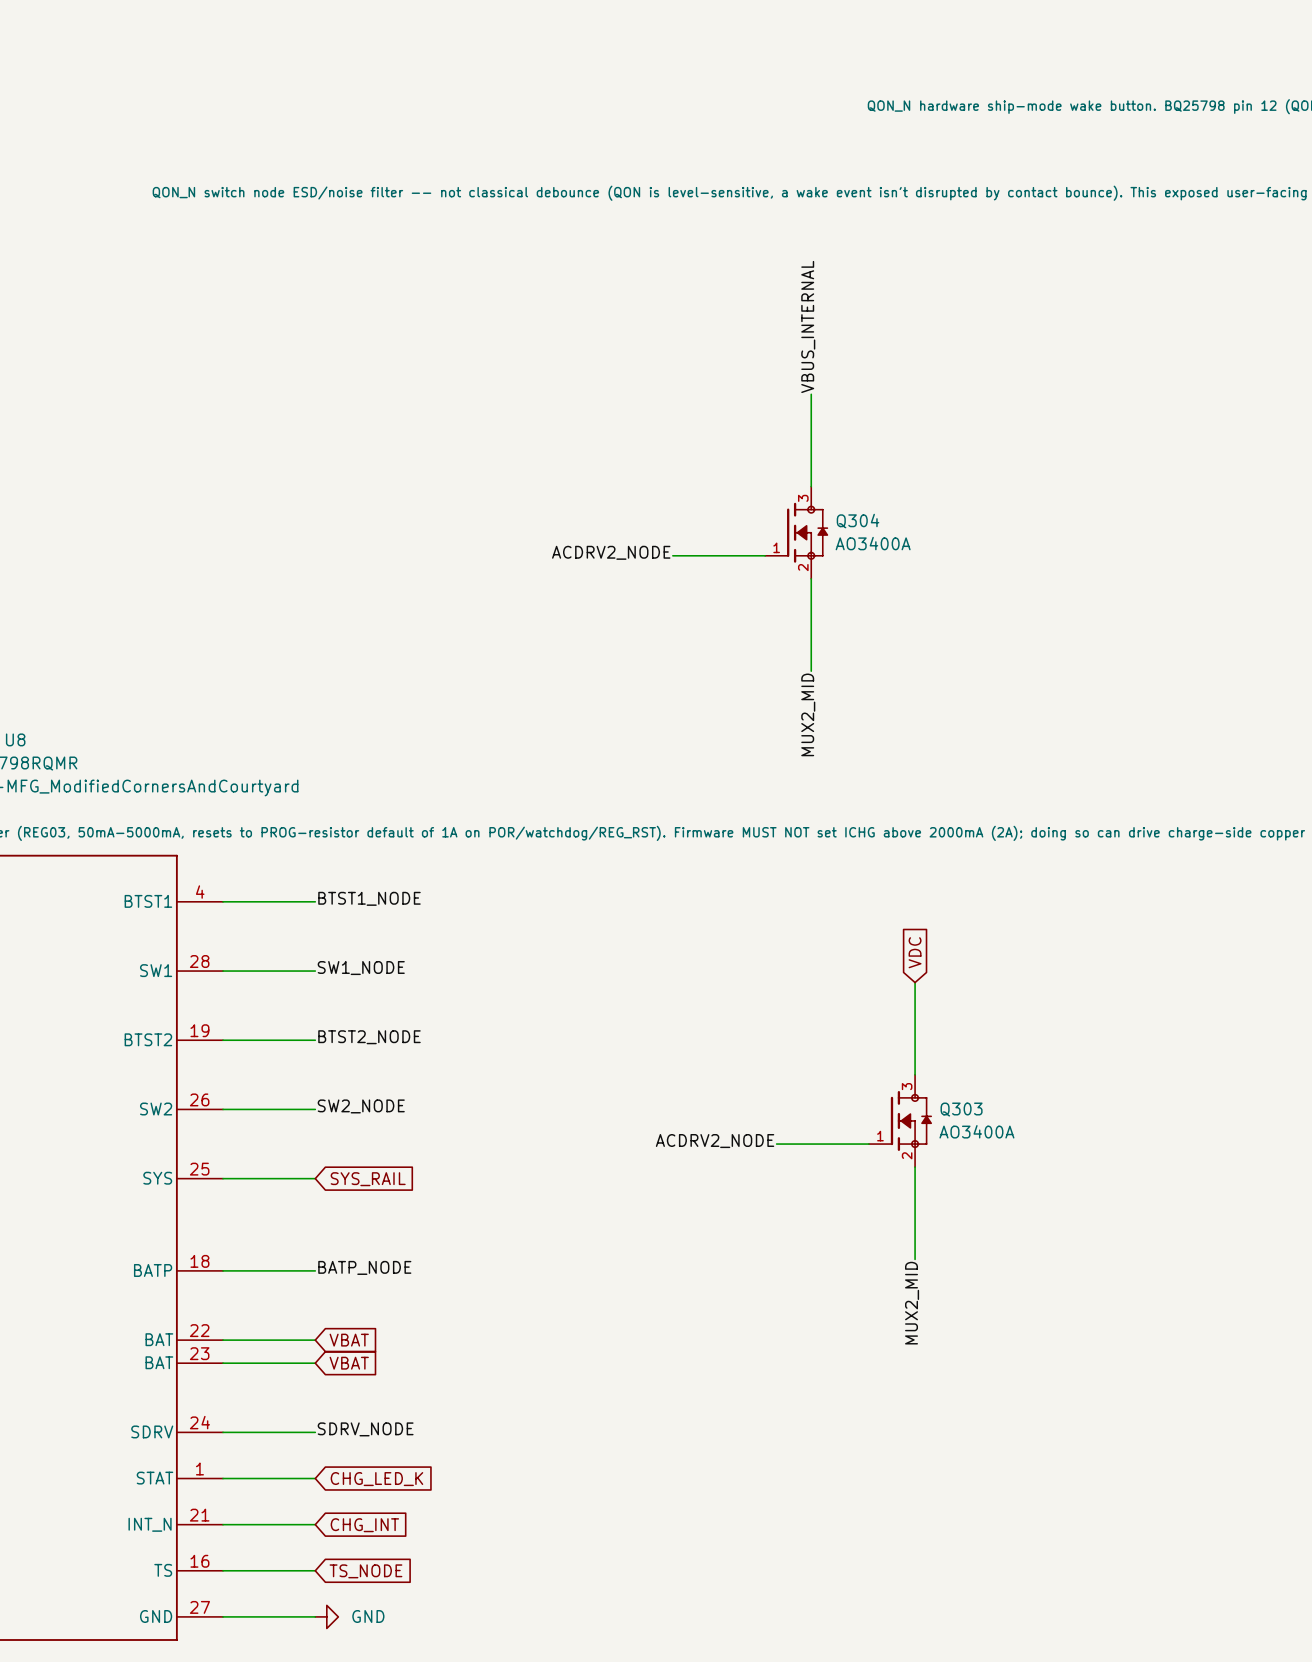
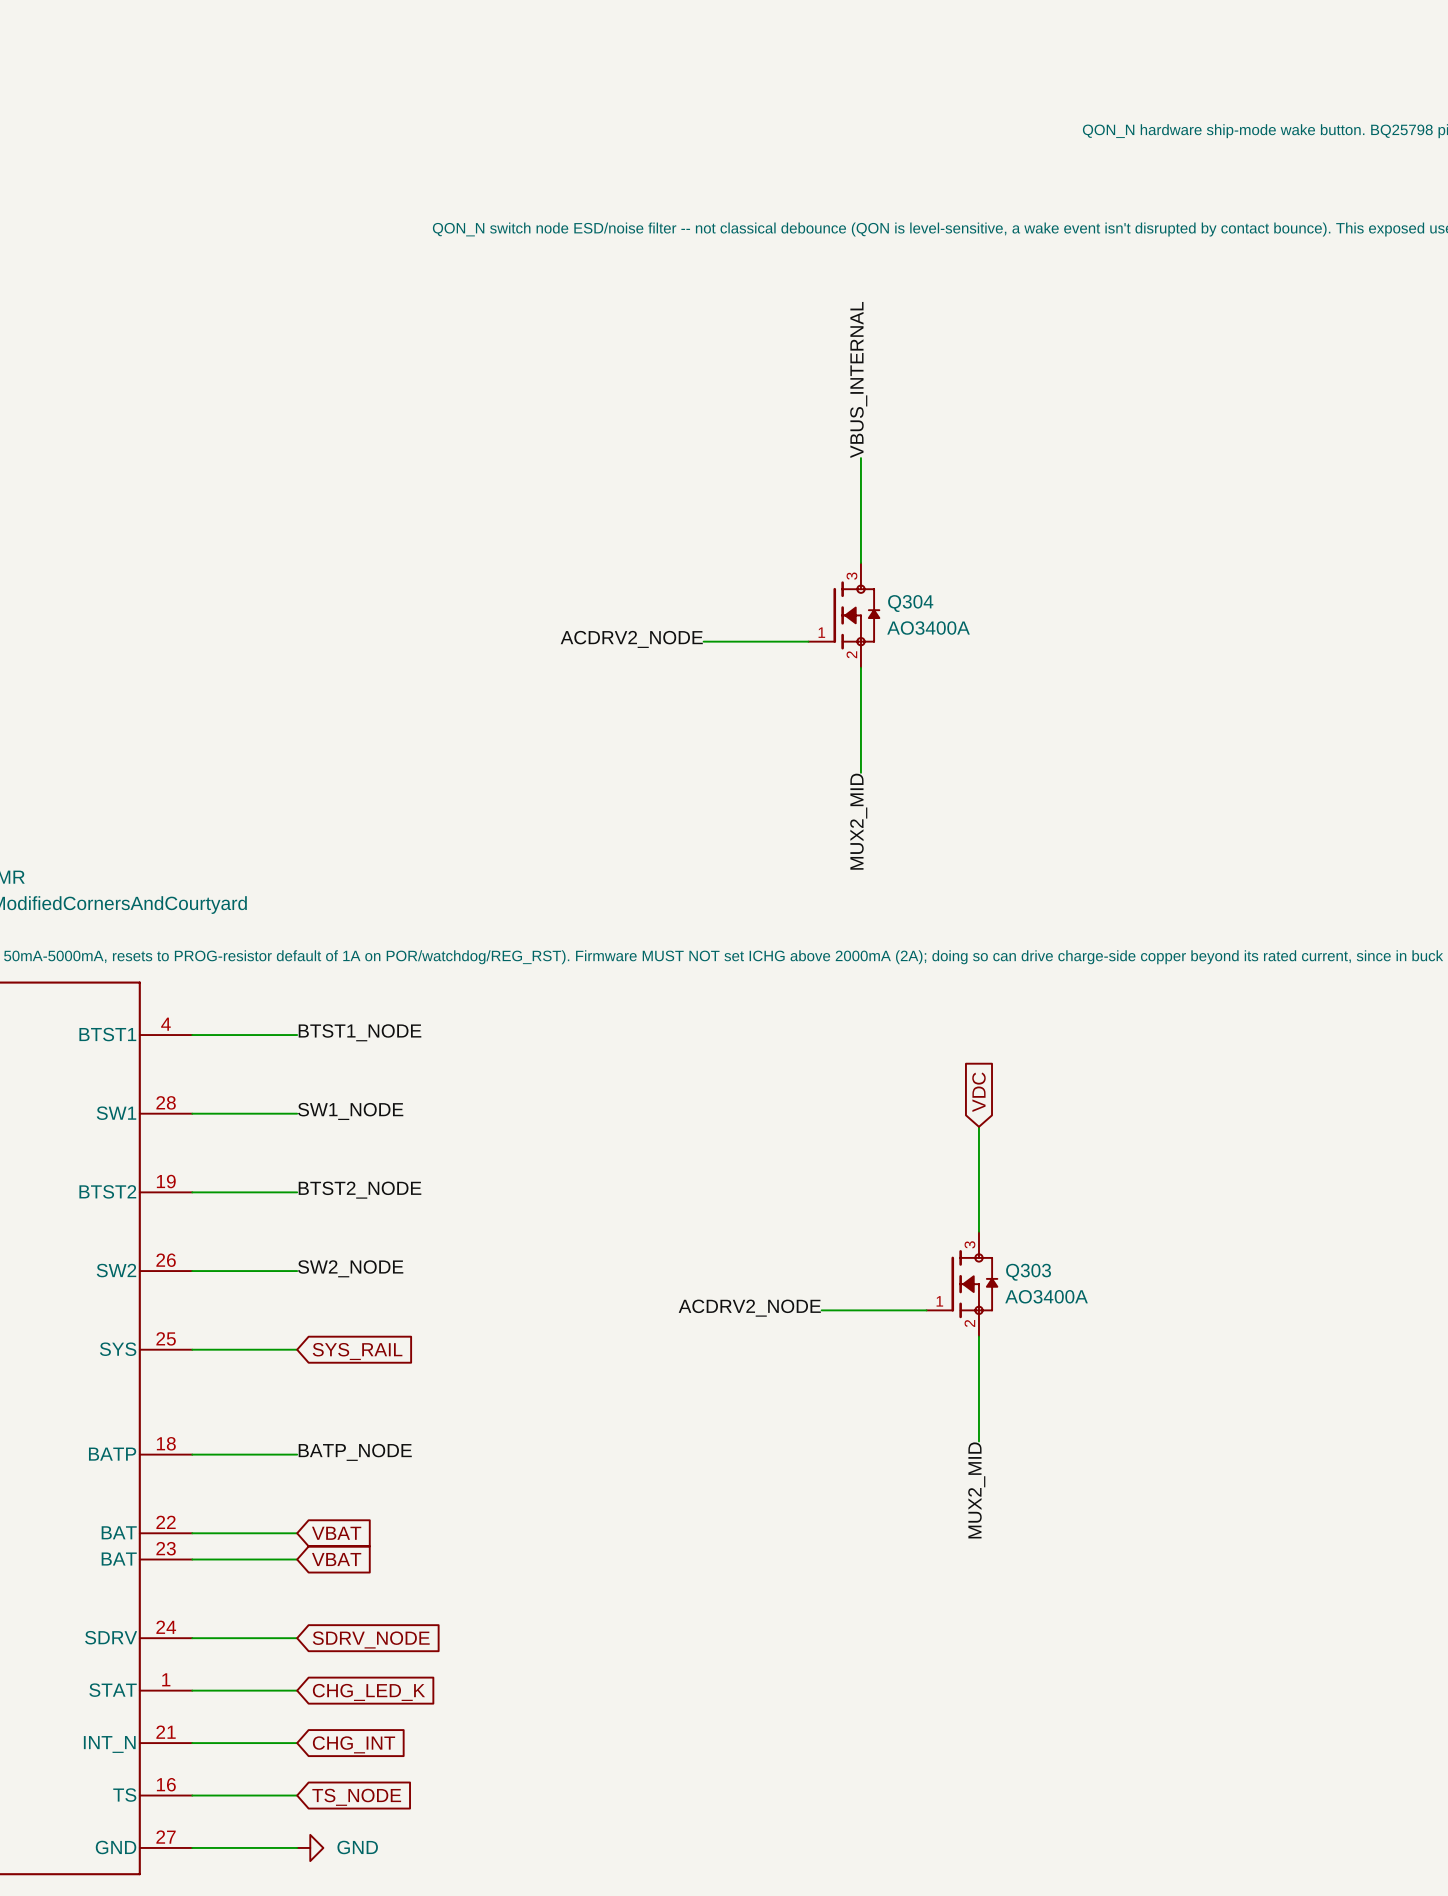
label: SDRV_NODE (365, 1429) -> none
global label: none -> SDRV_NODE (371, 1639)

